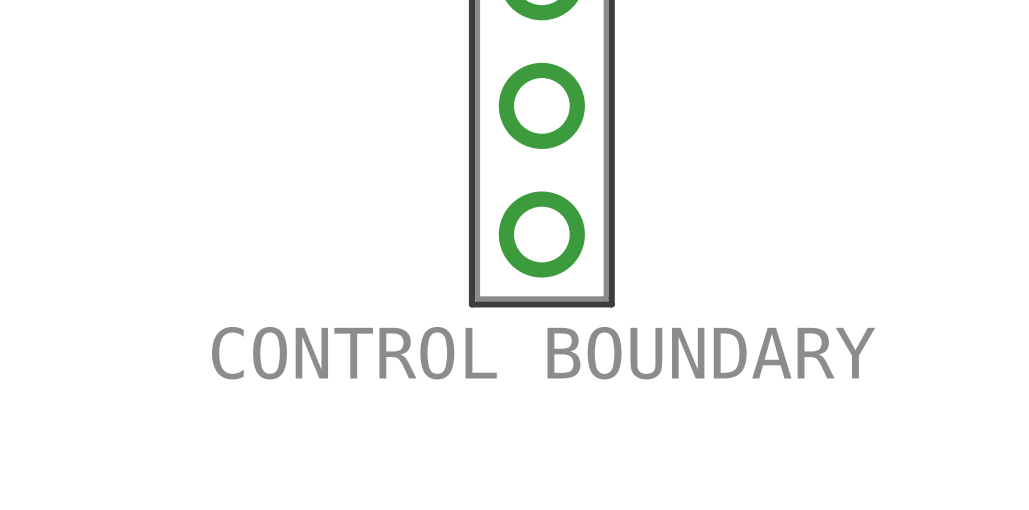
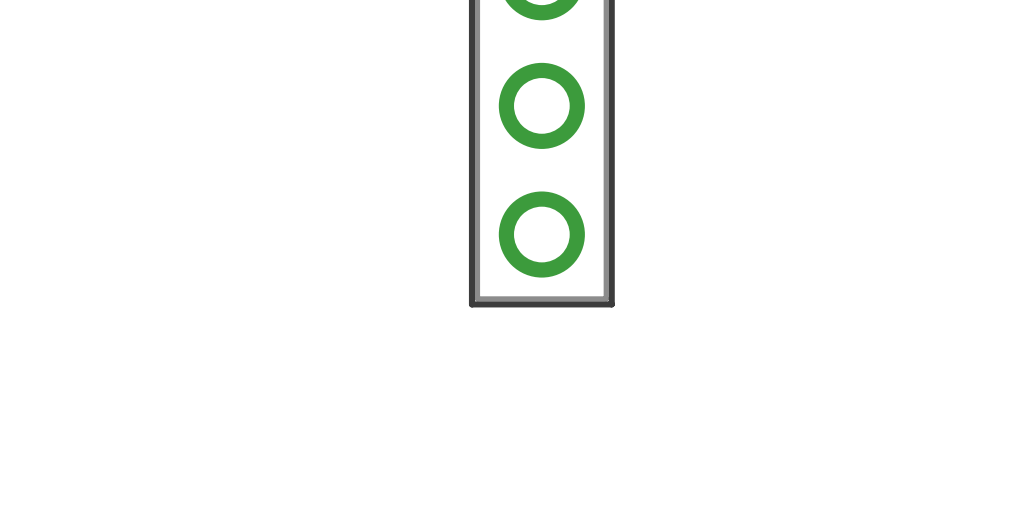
part value: CONTROL BOUNDARY (543, 353) -> none

